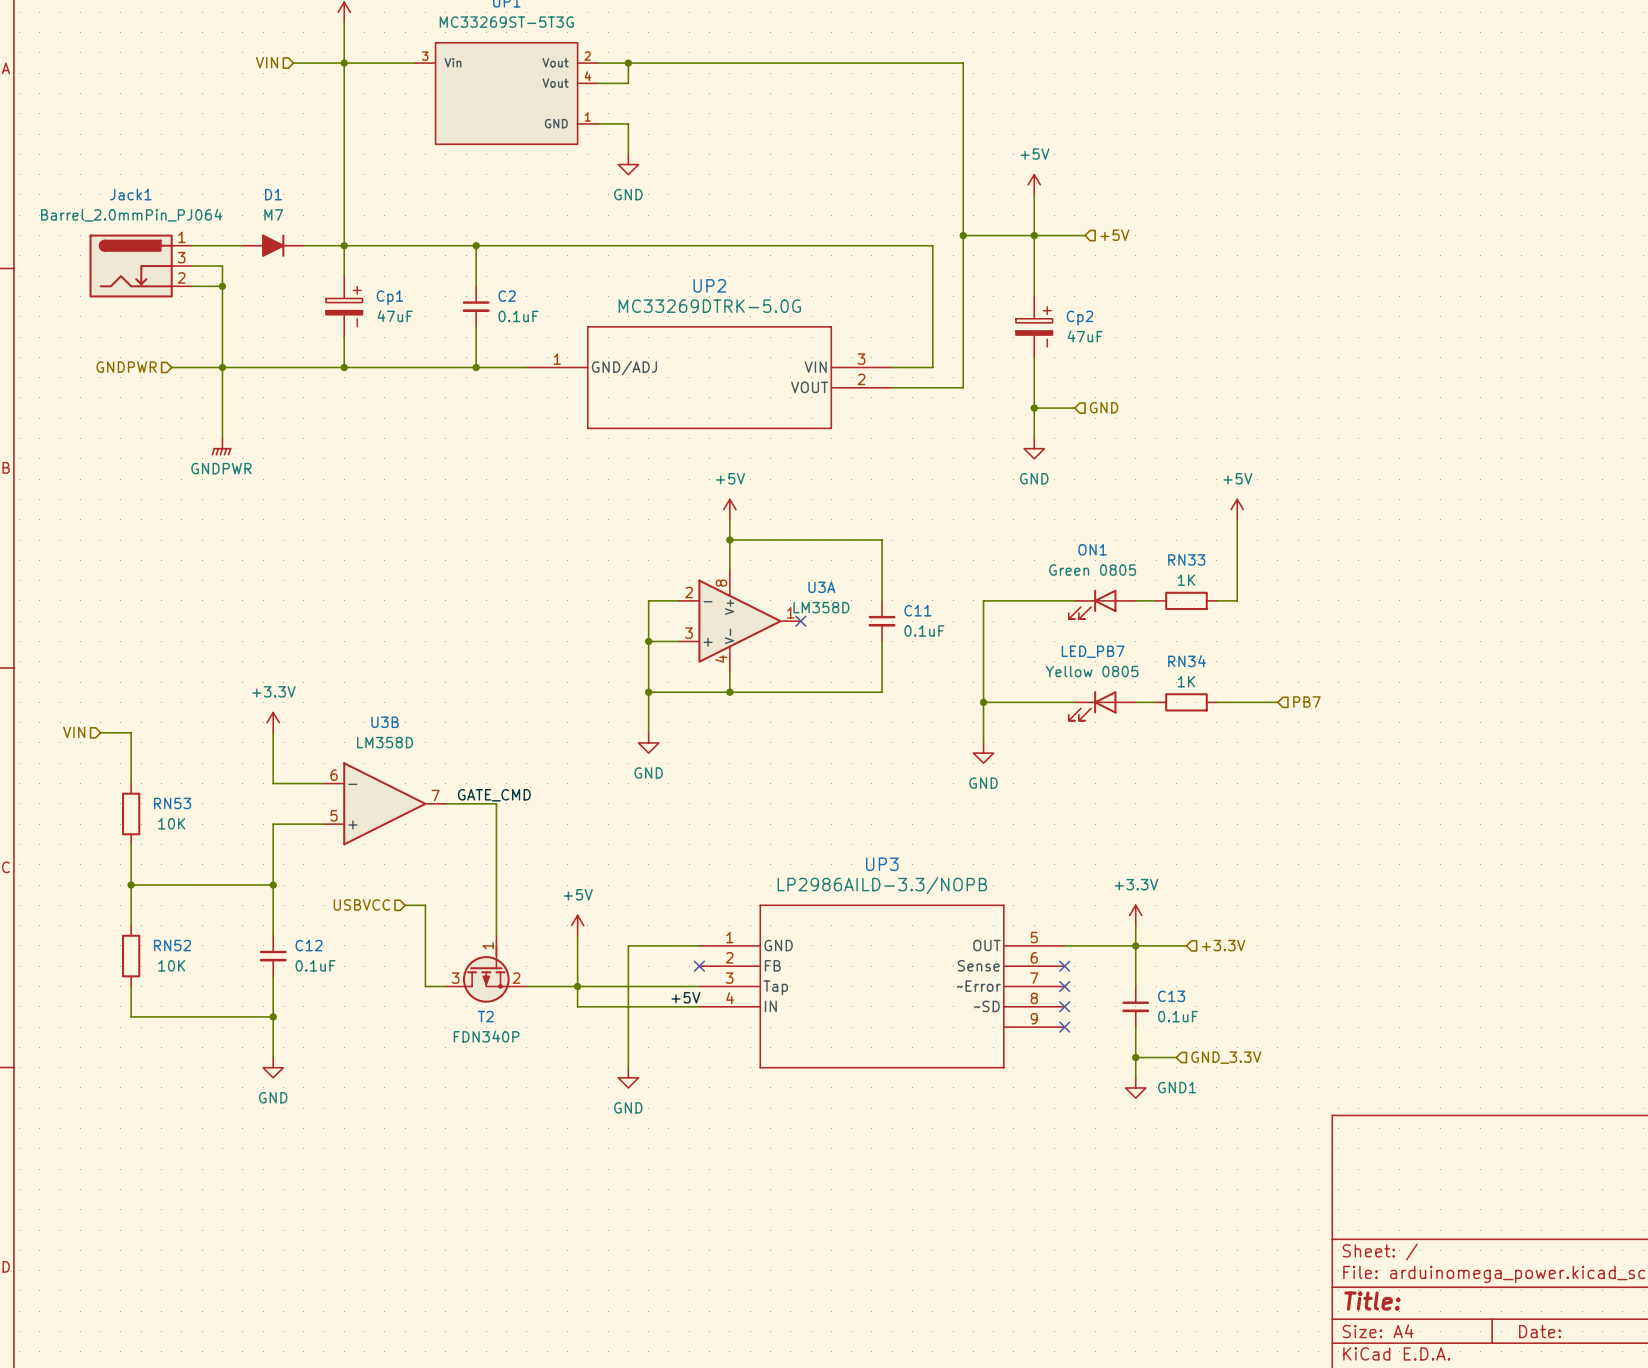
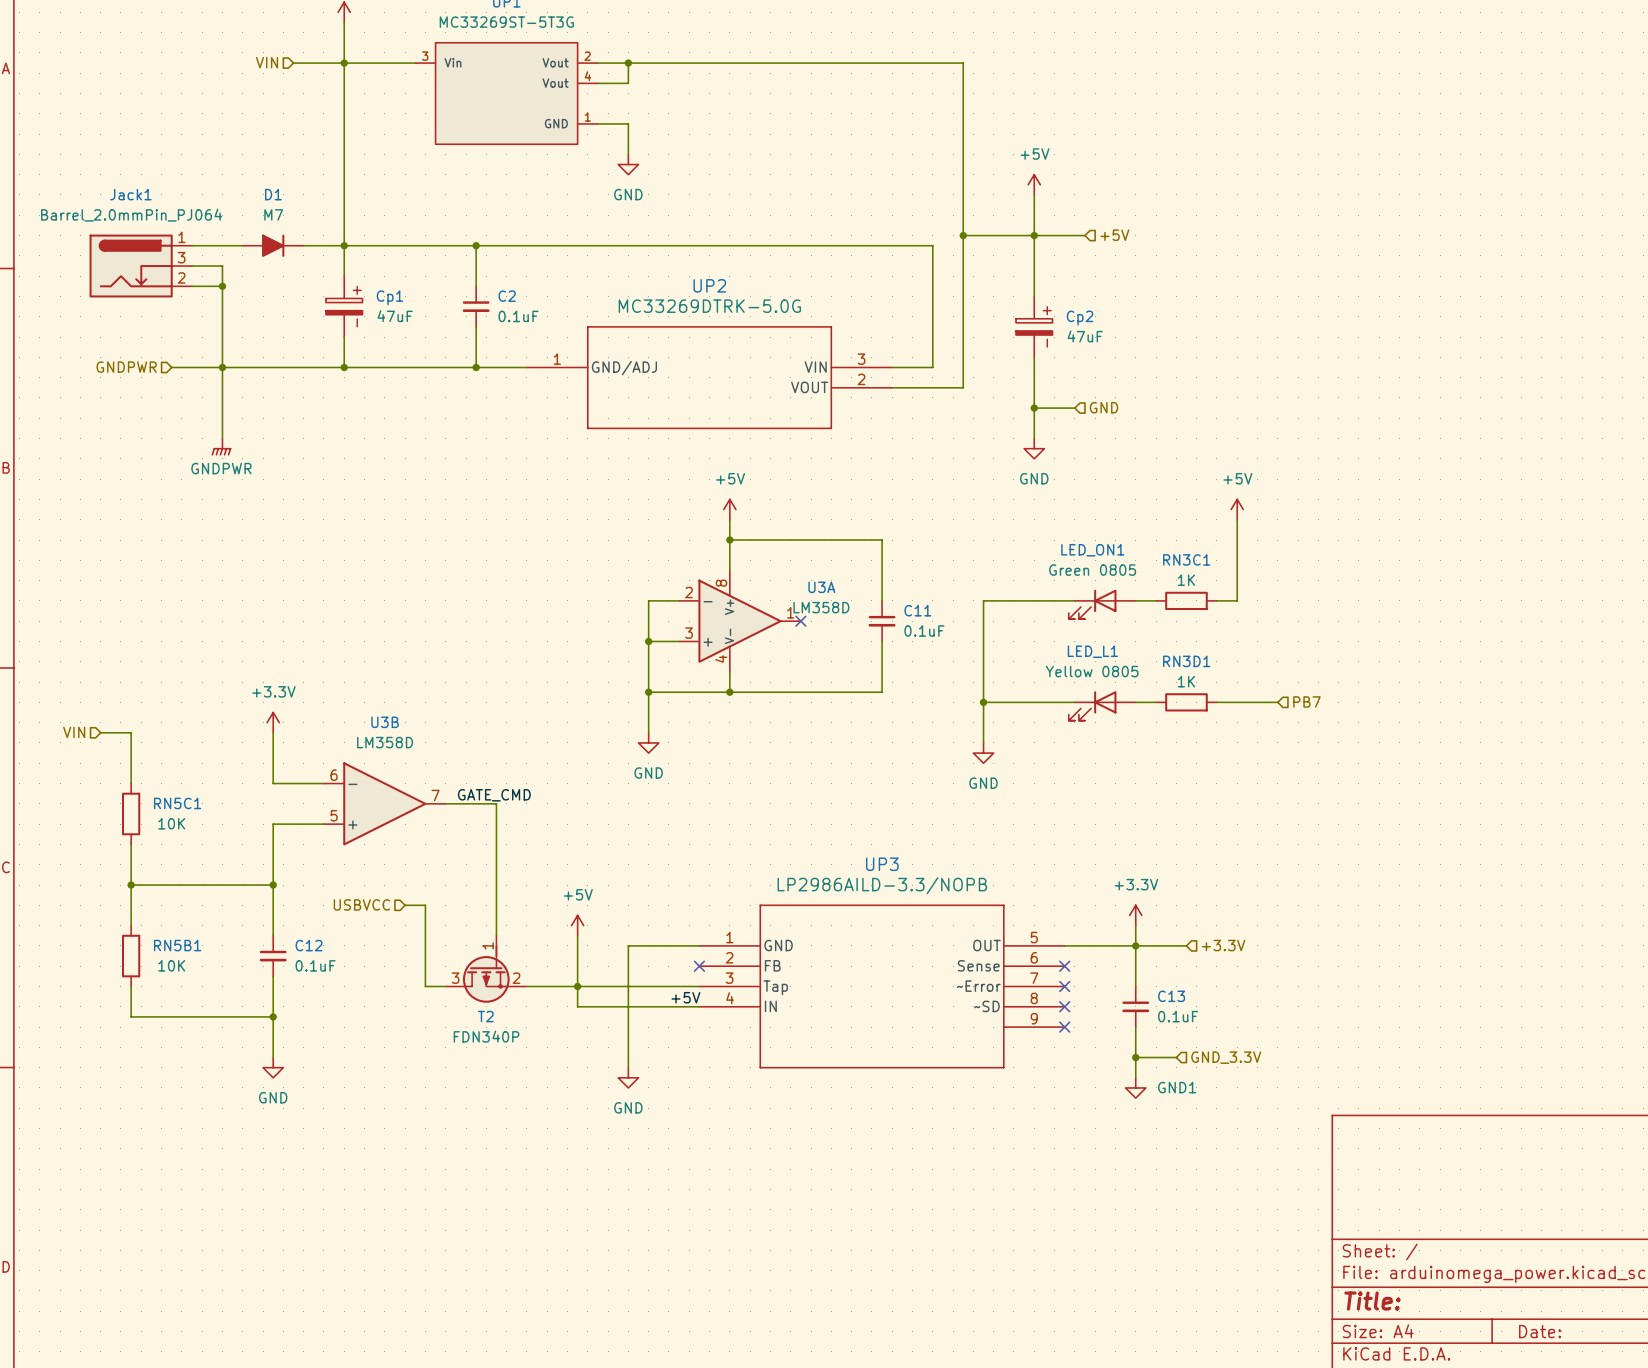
ON1 name: ON1 (1092, 549) -> LED_ON1 (1092, 550)
RN33 name: RN33 (1186, 559) -> RN3C1 (1186, 559)
LED_PB7 name: LED_PB7 (1093, 651) -> LED_L1 (1092, 651)
RN34 name: RN34 (1186, 661) -> RN3D1 (1186, 661)
RN53 name: RN53 (172, 803) -> RN5C1 (177, 803)
RN52 name: RN52 (172, 945) -> RN5B1 (177, 945)

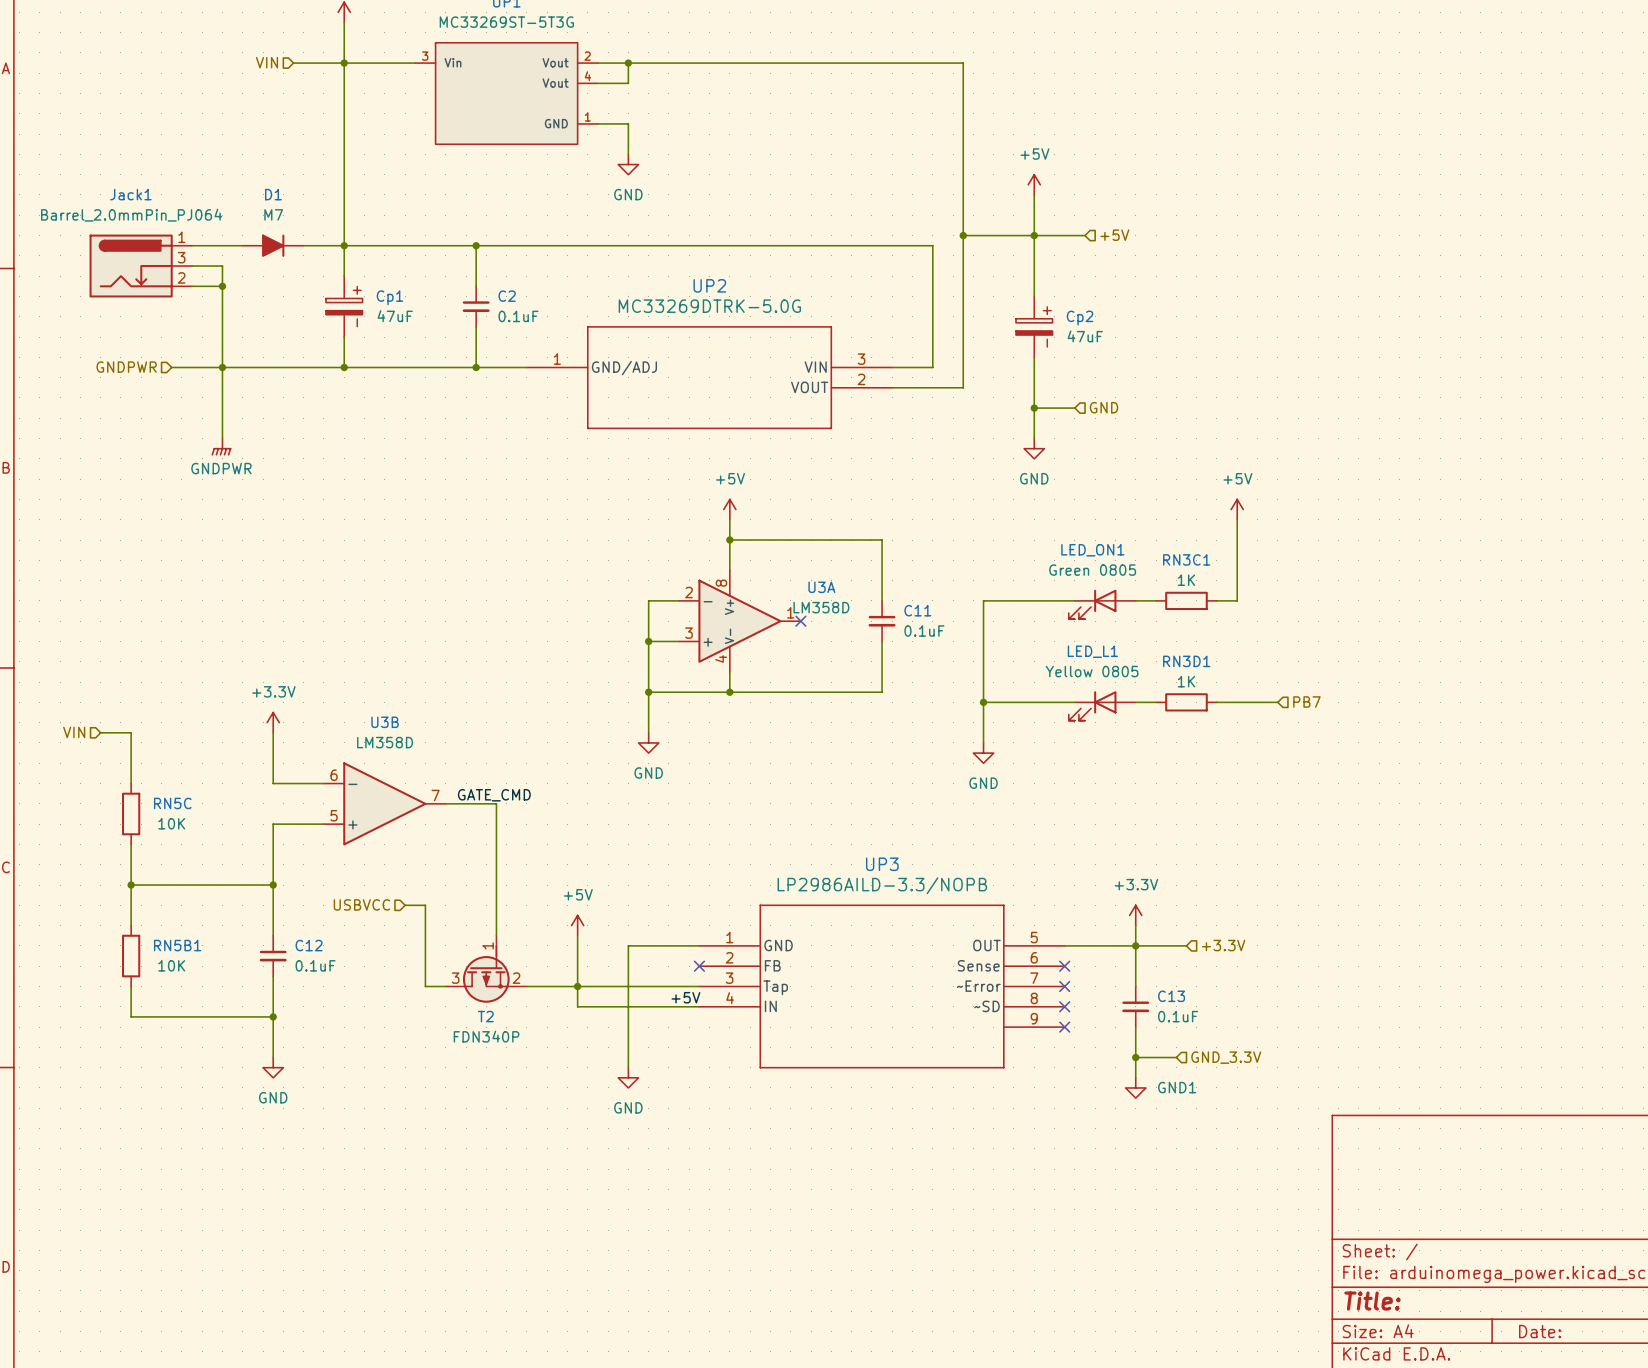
RN5C1 name: RN5C1 (177, 803) -> RN5C (172, 803)

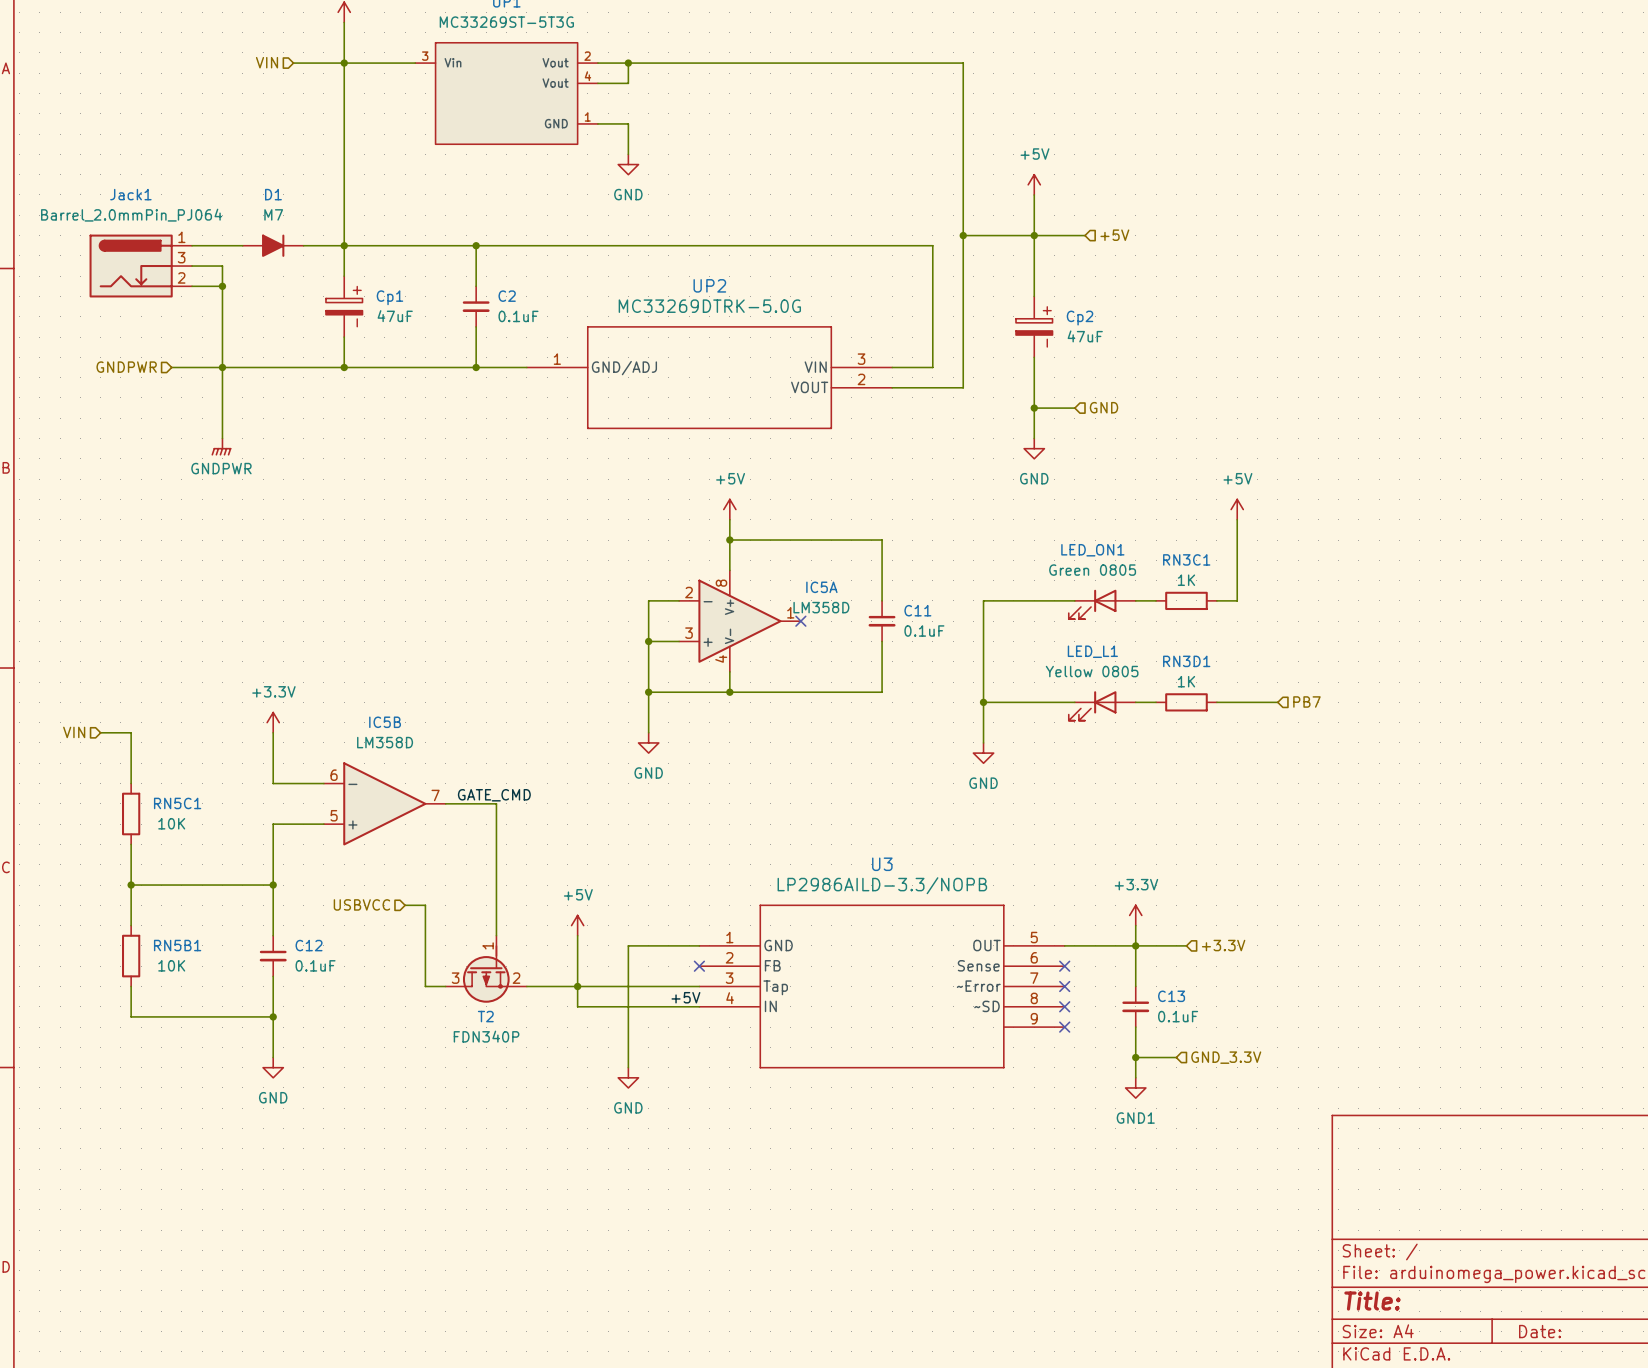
U3A name: U3A (821, 587) -> IC5A (821, 587)
U3B name: U3B (385, 722) -> IC5B (385, 722)
RN5C name: RN5C (172, 803) -> RN5C1 (177, 803)
UP3 name: UP3 (882, 864) -> U3 (882, 864)
power symbol text position: GND1 (1177, 1087) -> GND1 (1135, 1118)

